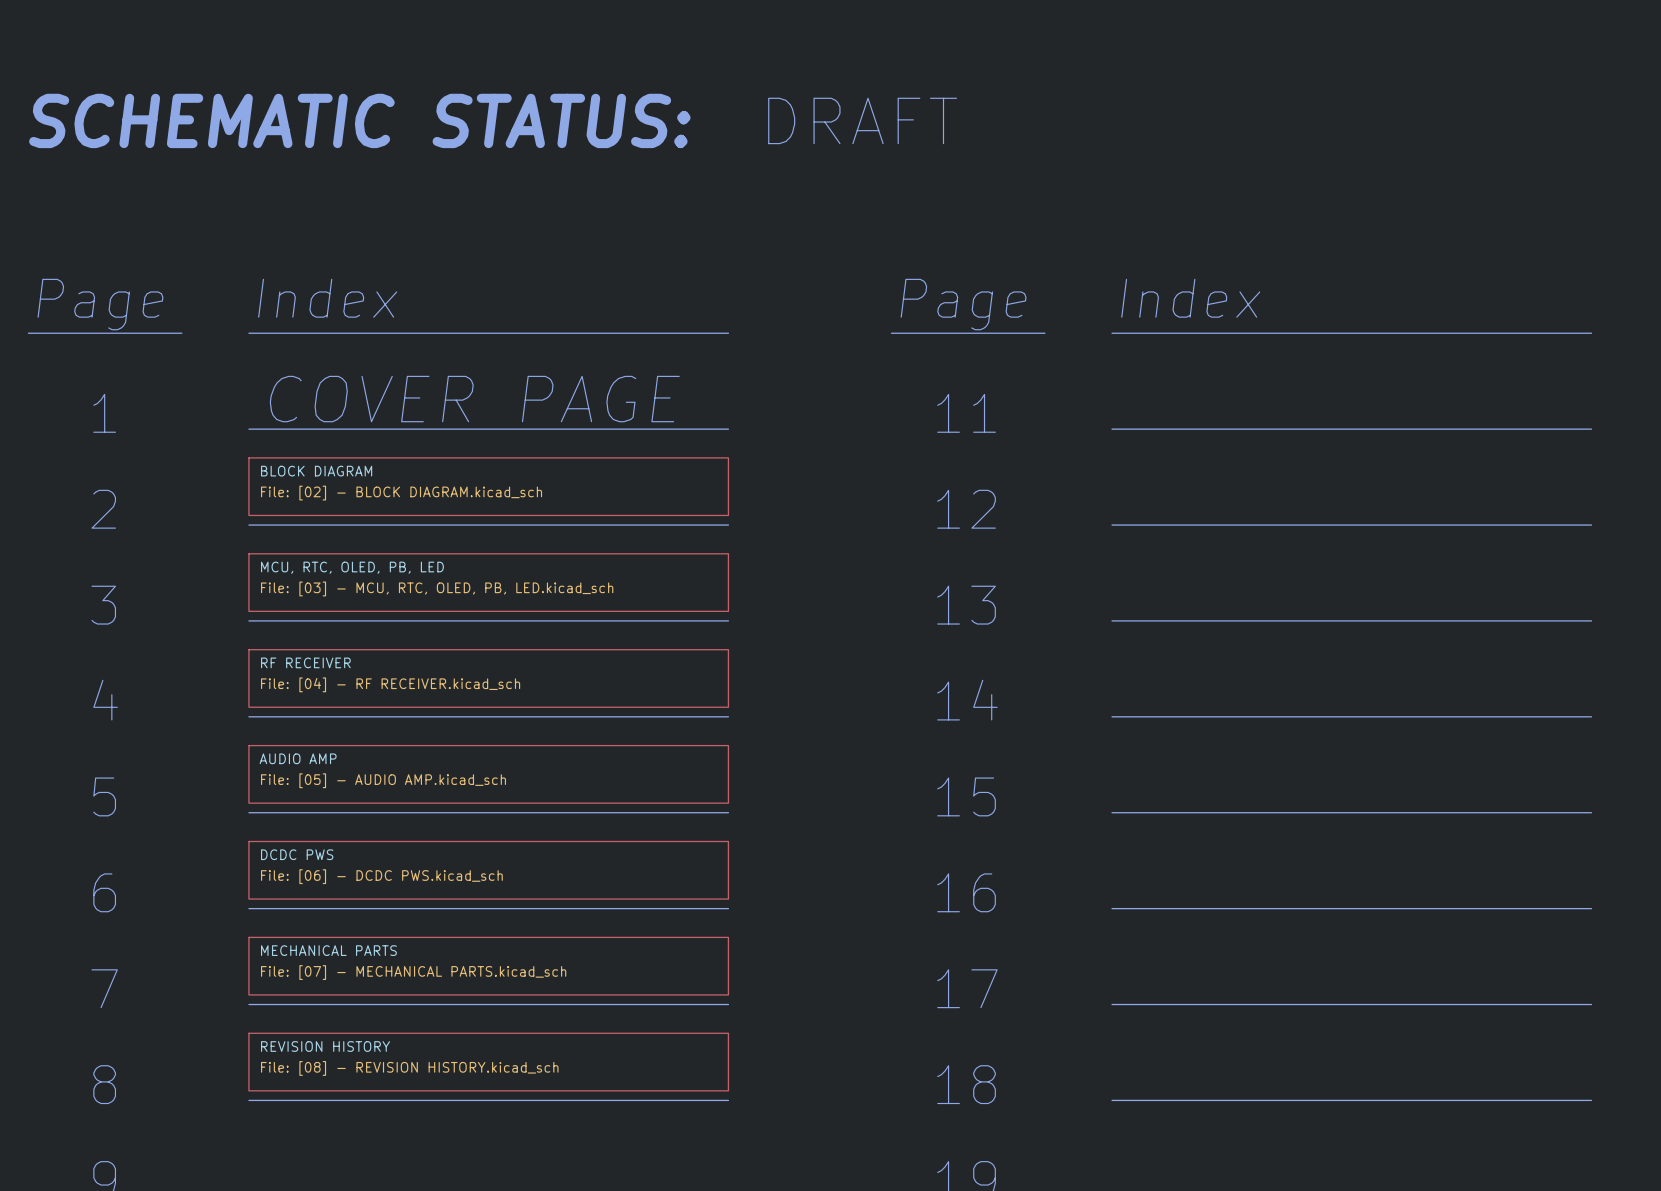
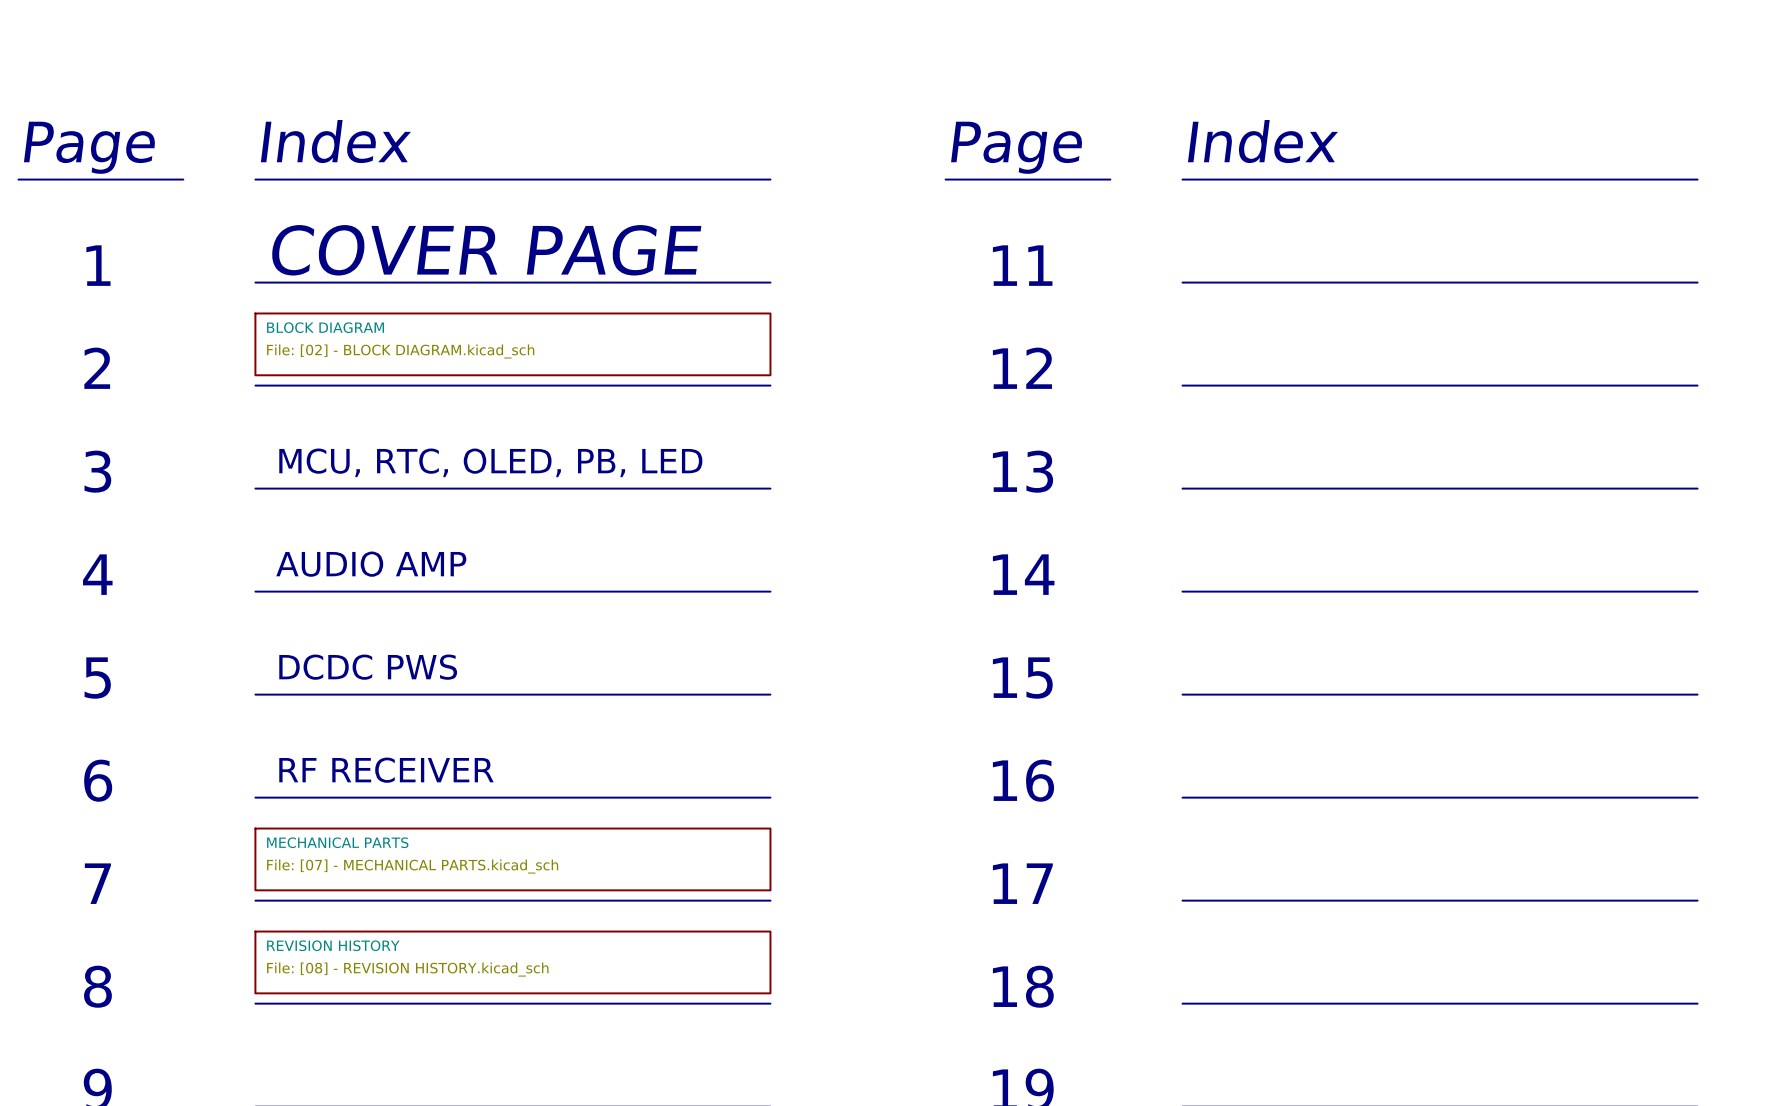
sheet MCU, RTC, OLED, PB, LED: File: [03] - MCU, RTC, OLED, PB, LED.kicad_sch (488, 582) -> none
text: none -> MCU, RTC, OLED, PB, LED (490, 462)
sheet RF RECEIVER: File: [04] - RF RECEIVER.kicad_sch (488, 678) -> none
text: none -> AUDIO AMP (371, 564)
sheet AUDIO AMP: File: [05] - AUDIO AMP.kicad_sch (488, 774) -> none
text: none -> DCDC PWS (368, 667)
sheet DCDC PWS: File: [06] - DCDC PWS.kicad_sch (488, 870) -> none
text: none -> RF RECEIVER (386, 770)

